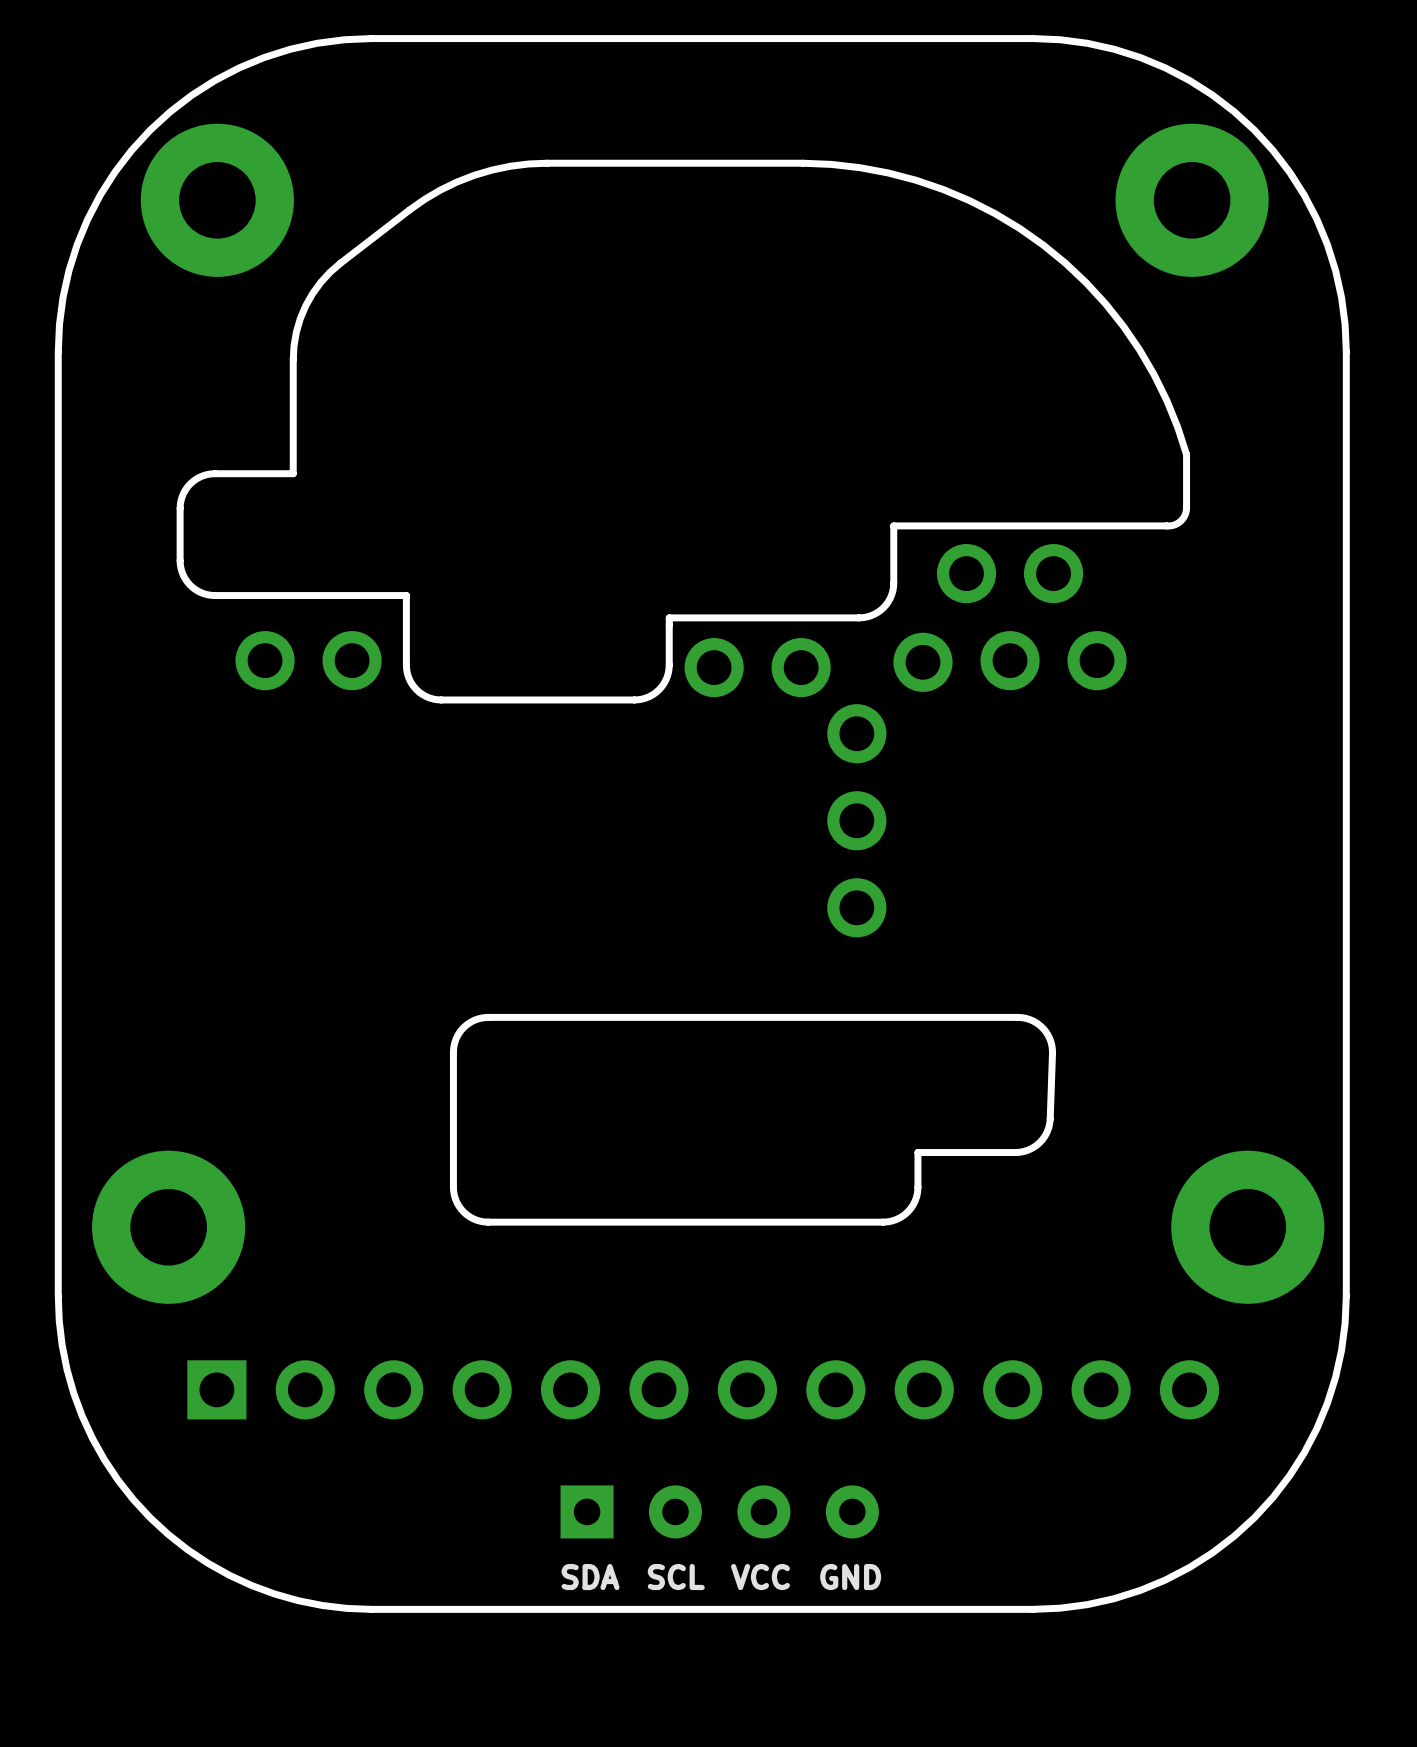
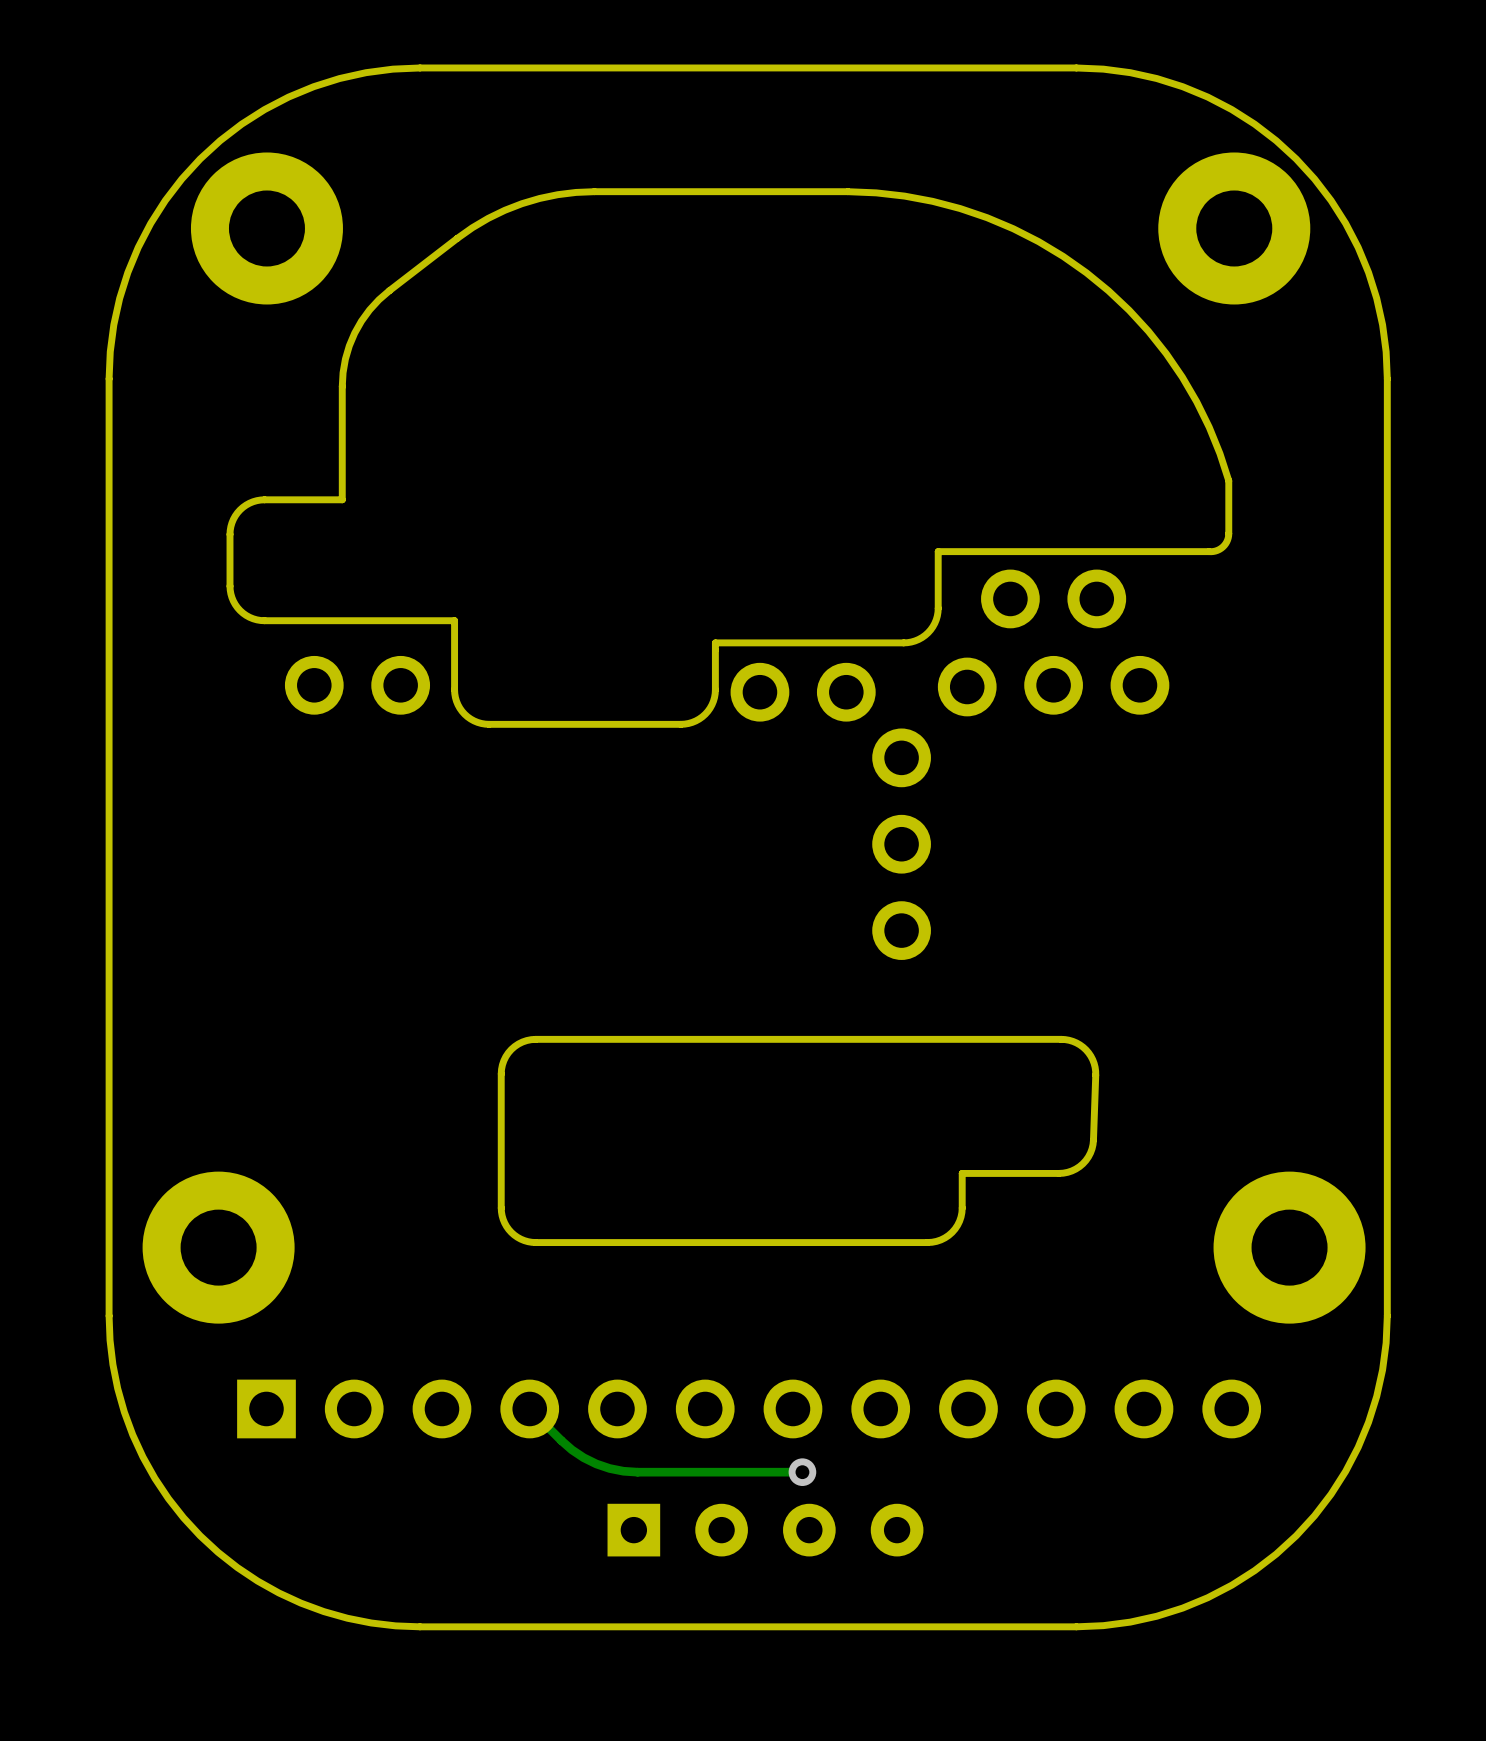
track: none -> (529, 1408) (571, 1449) (583, 1457) (609, 1468) (637, 1472) (802, 1472)
via: none -> (802, 1472)
text: SDA (590, 1577) -> none
text: SCL (676, 1577) -> none
text: VCC (760, 1577) -> none
text: GND (850, 1577) -> none

